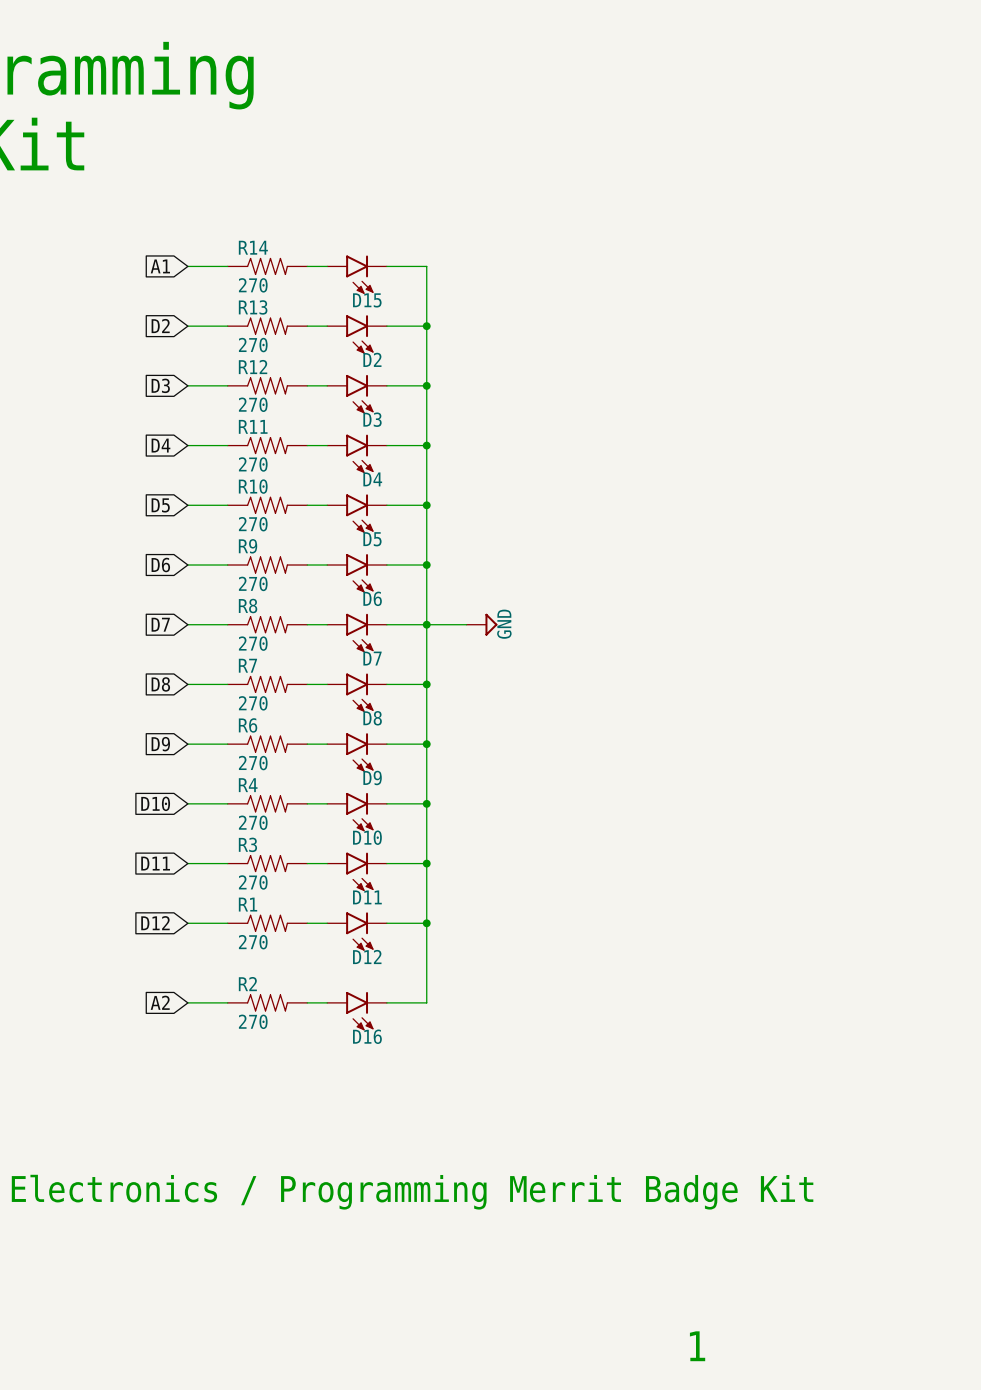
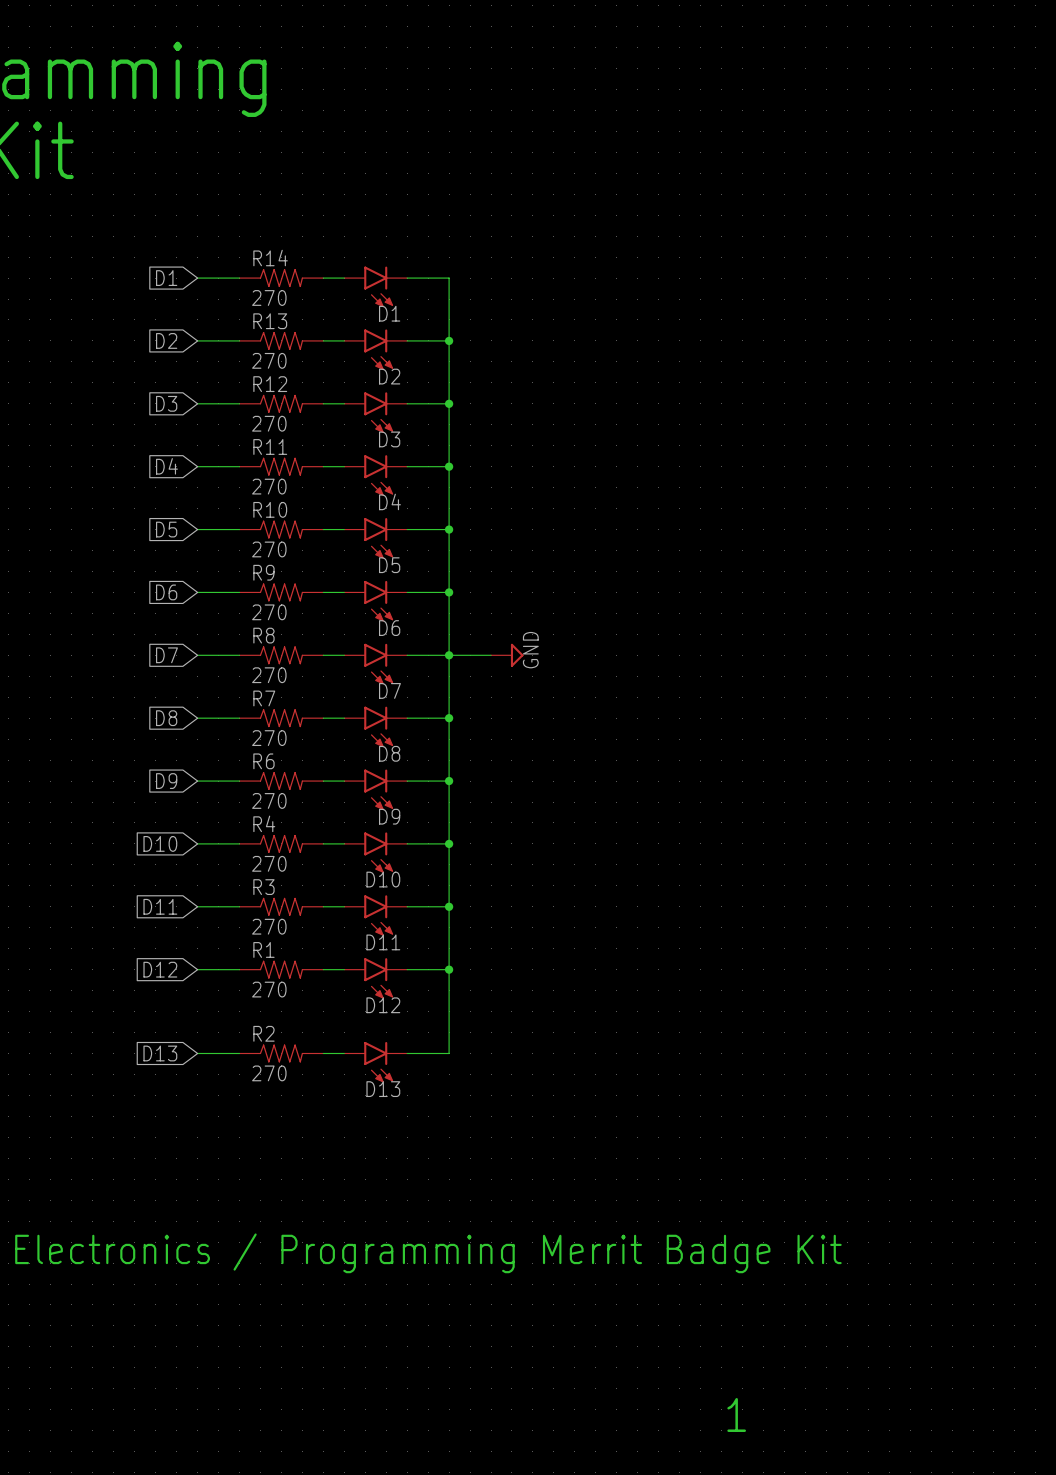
global label: A1 (160, 266) -> D1 (166, 278)
D15 name: D15 (367, 300) -> D1 (389, 313)
global label: A2 (160, 1002) -> D13 (160, 1053)
D16 name: D16 (367, 1036) -> D13 (383, 1089)

